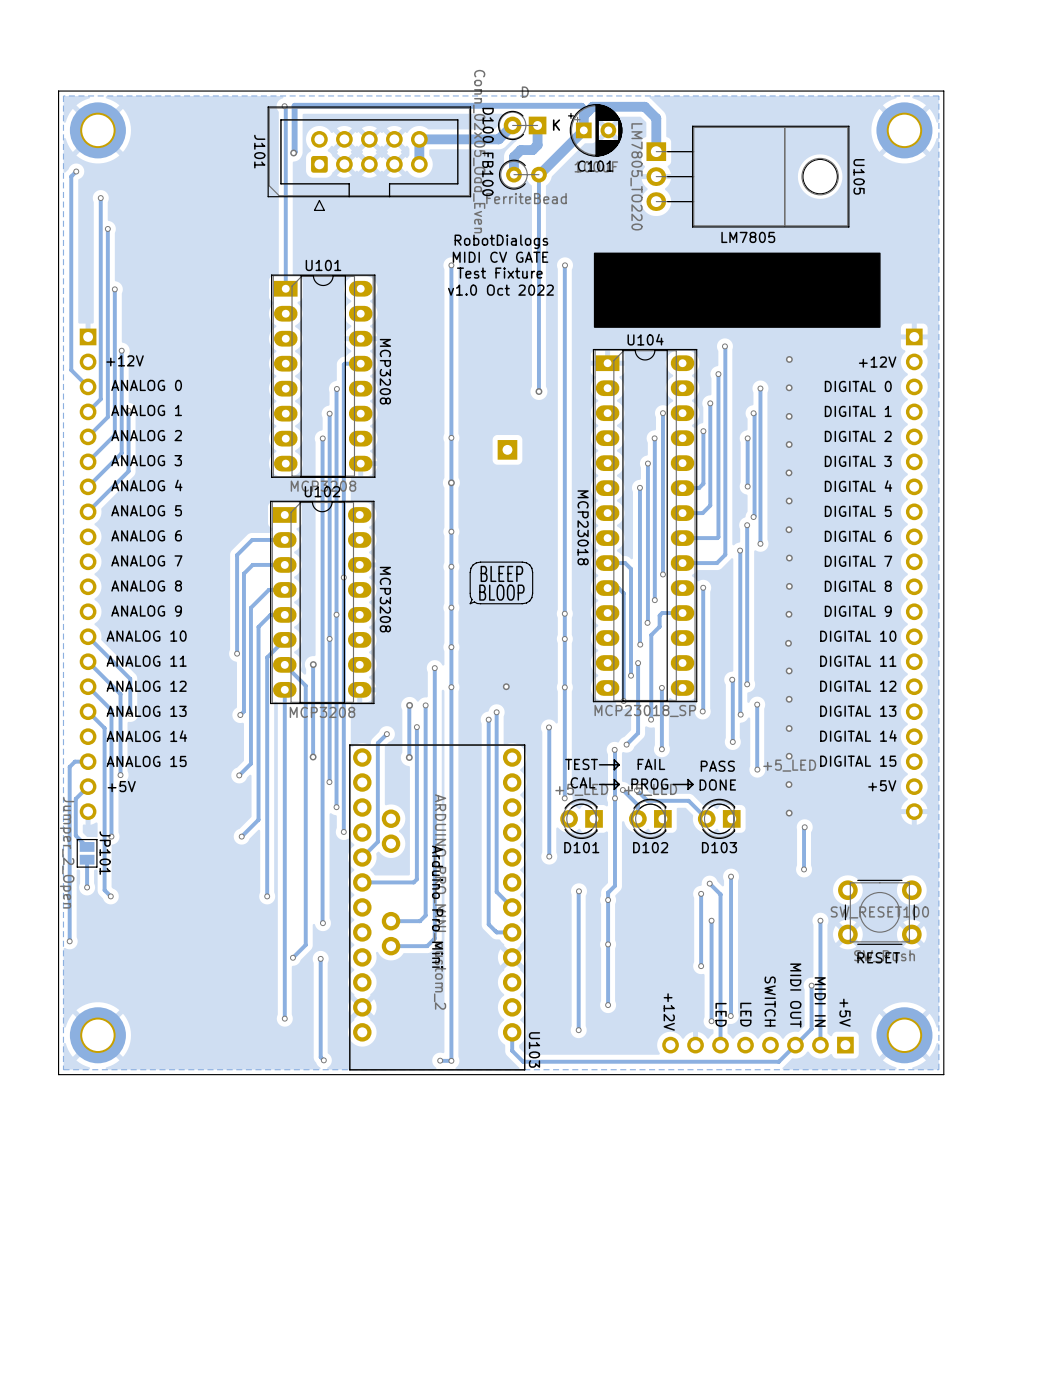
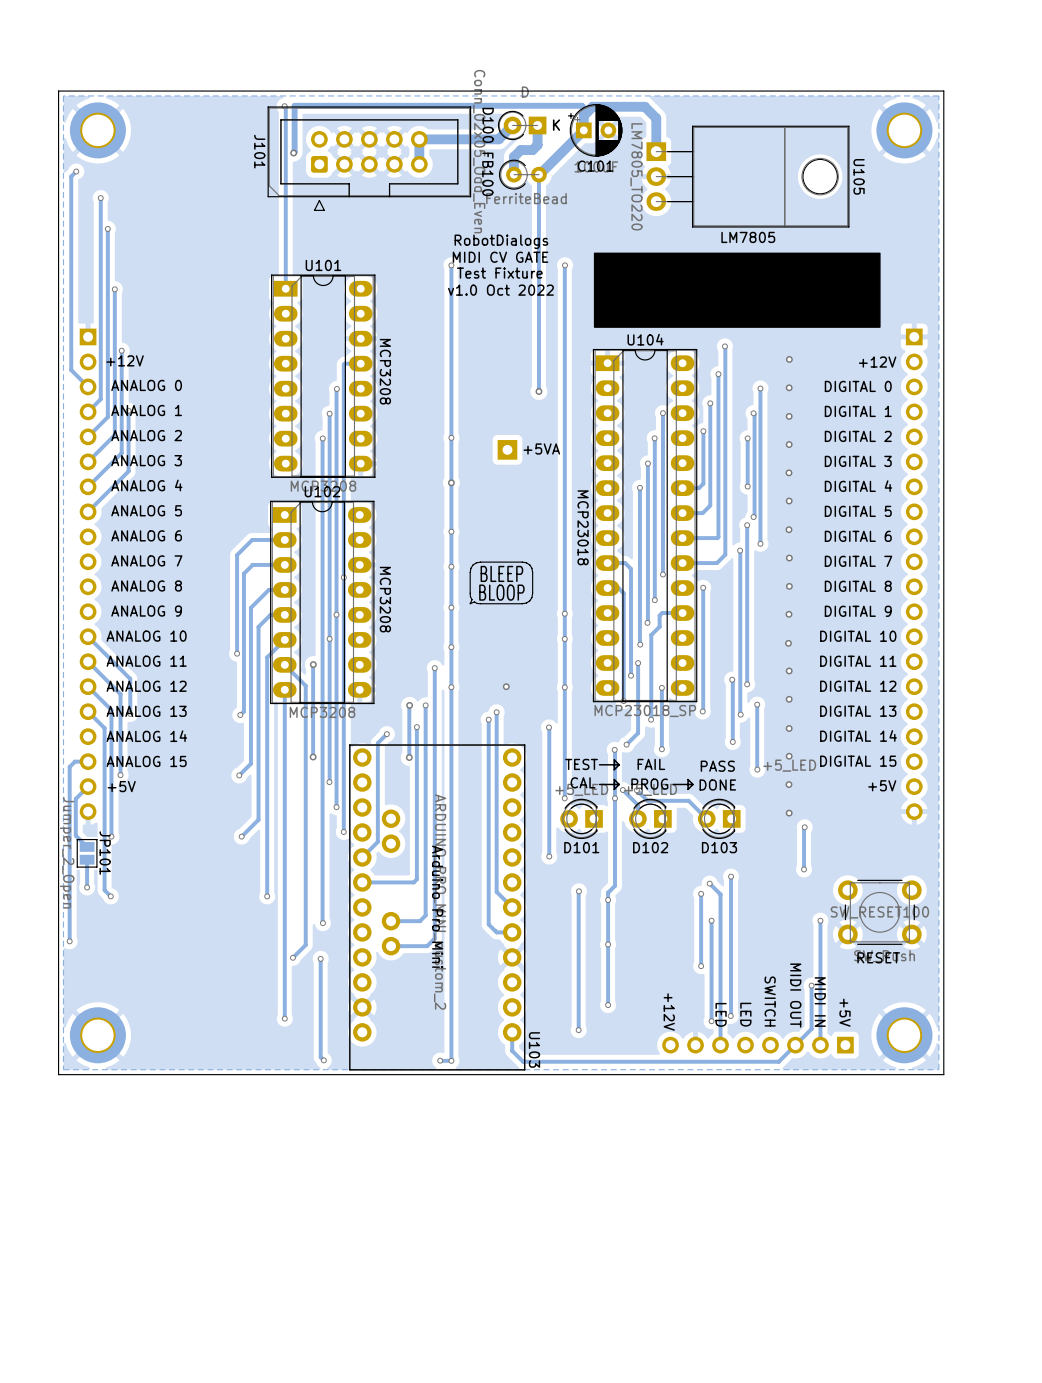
text: none -> +5VA (541, 449)

